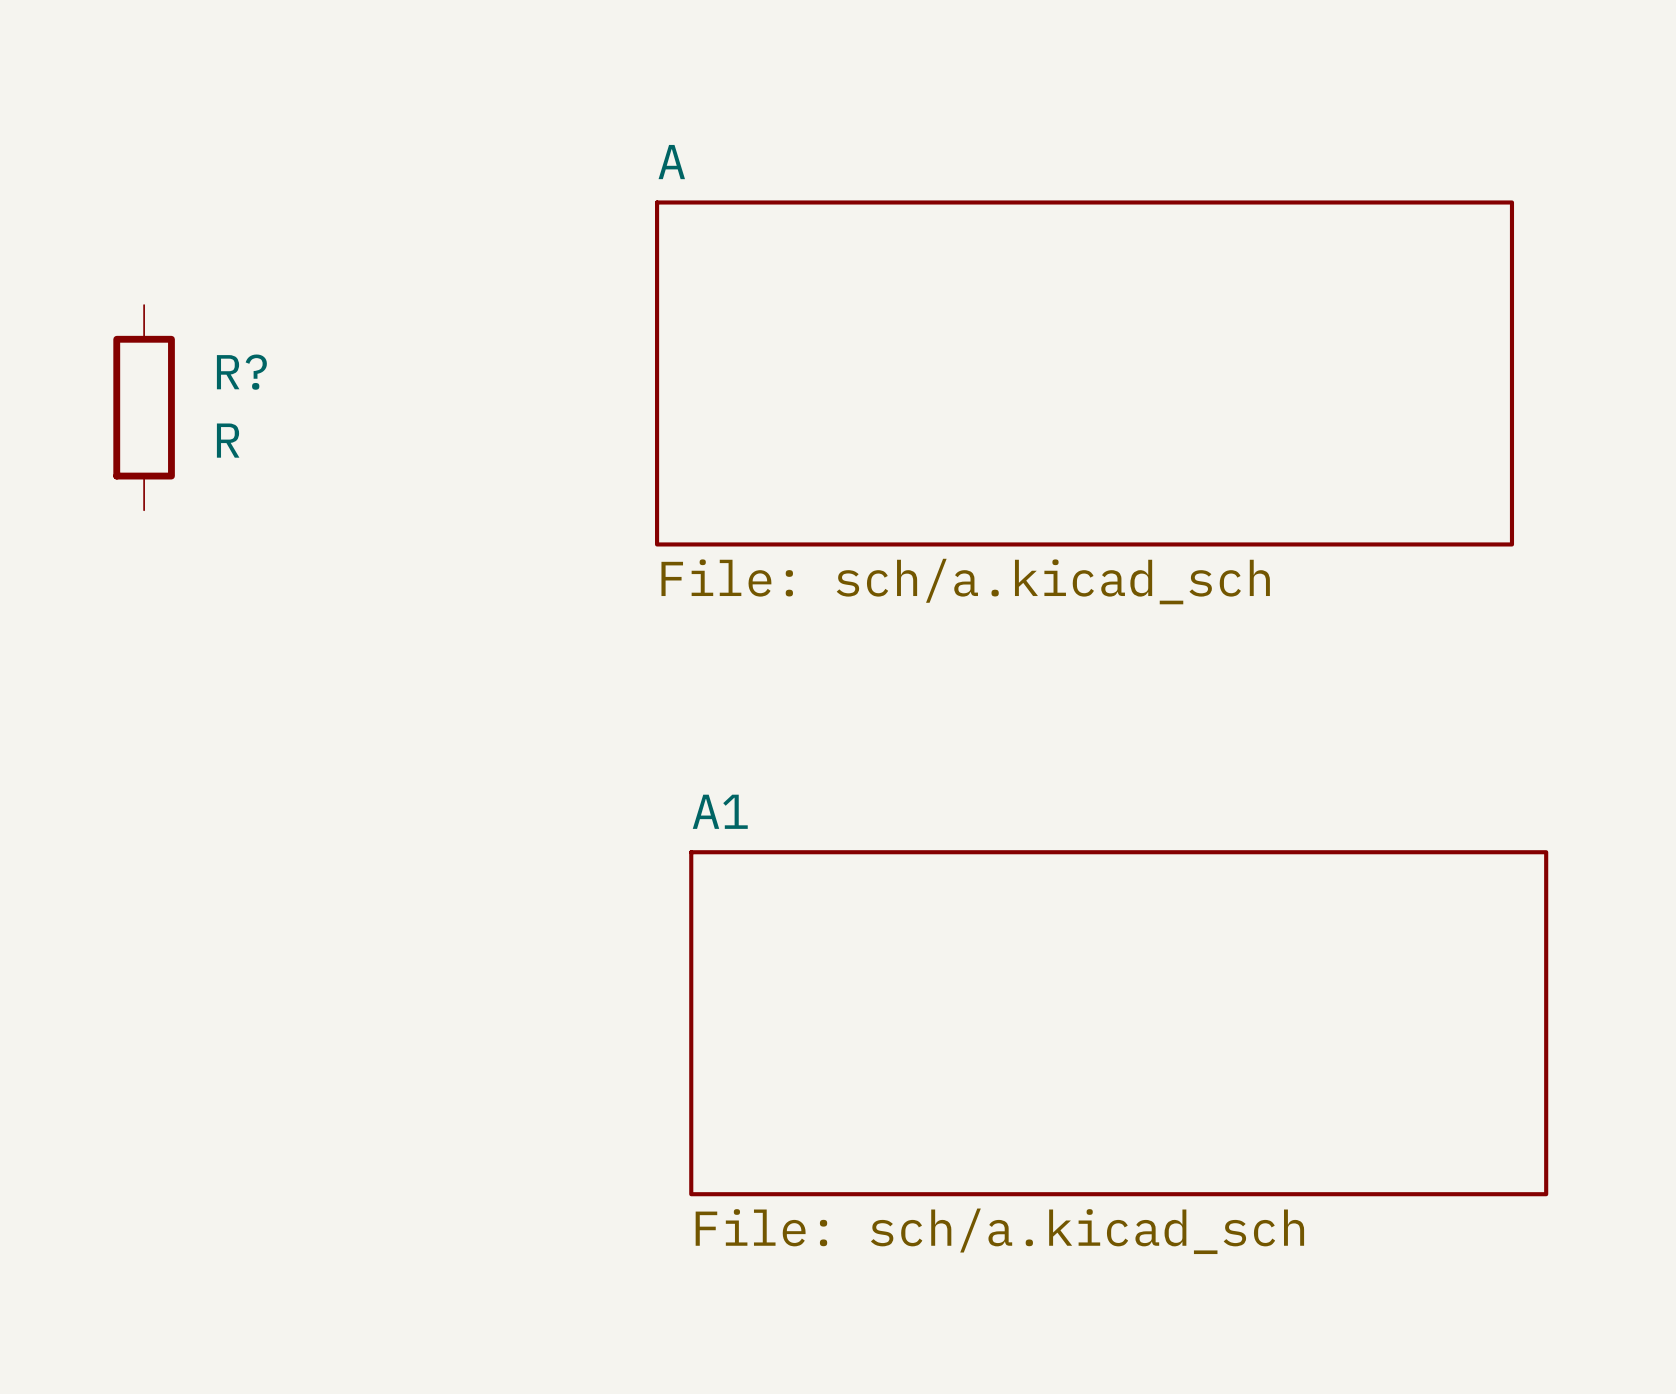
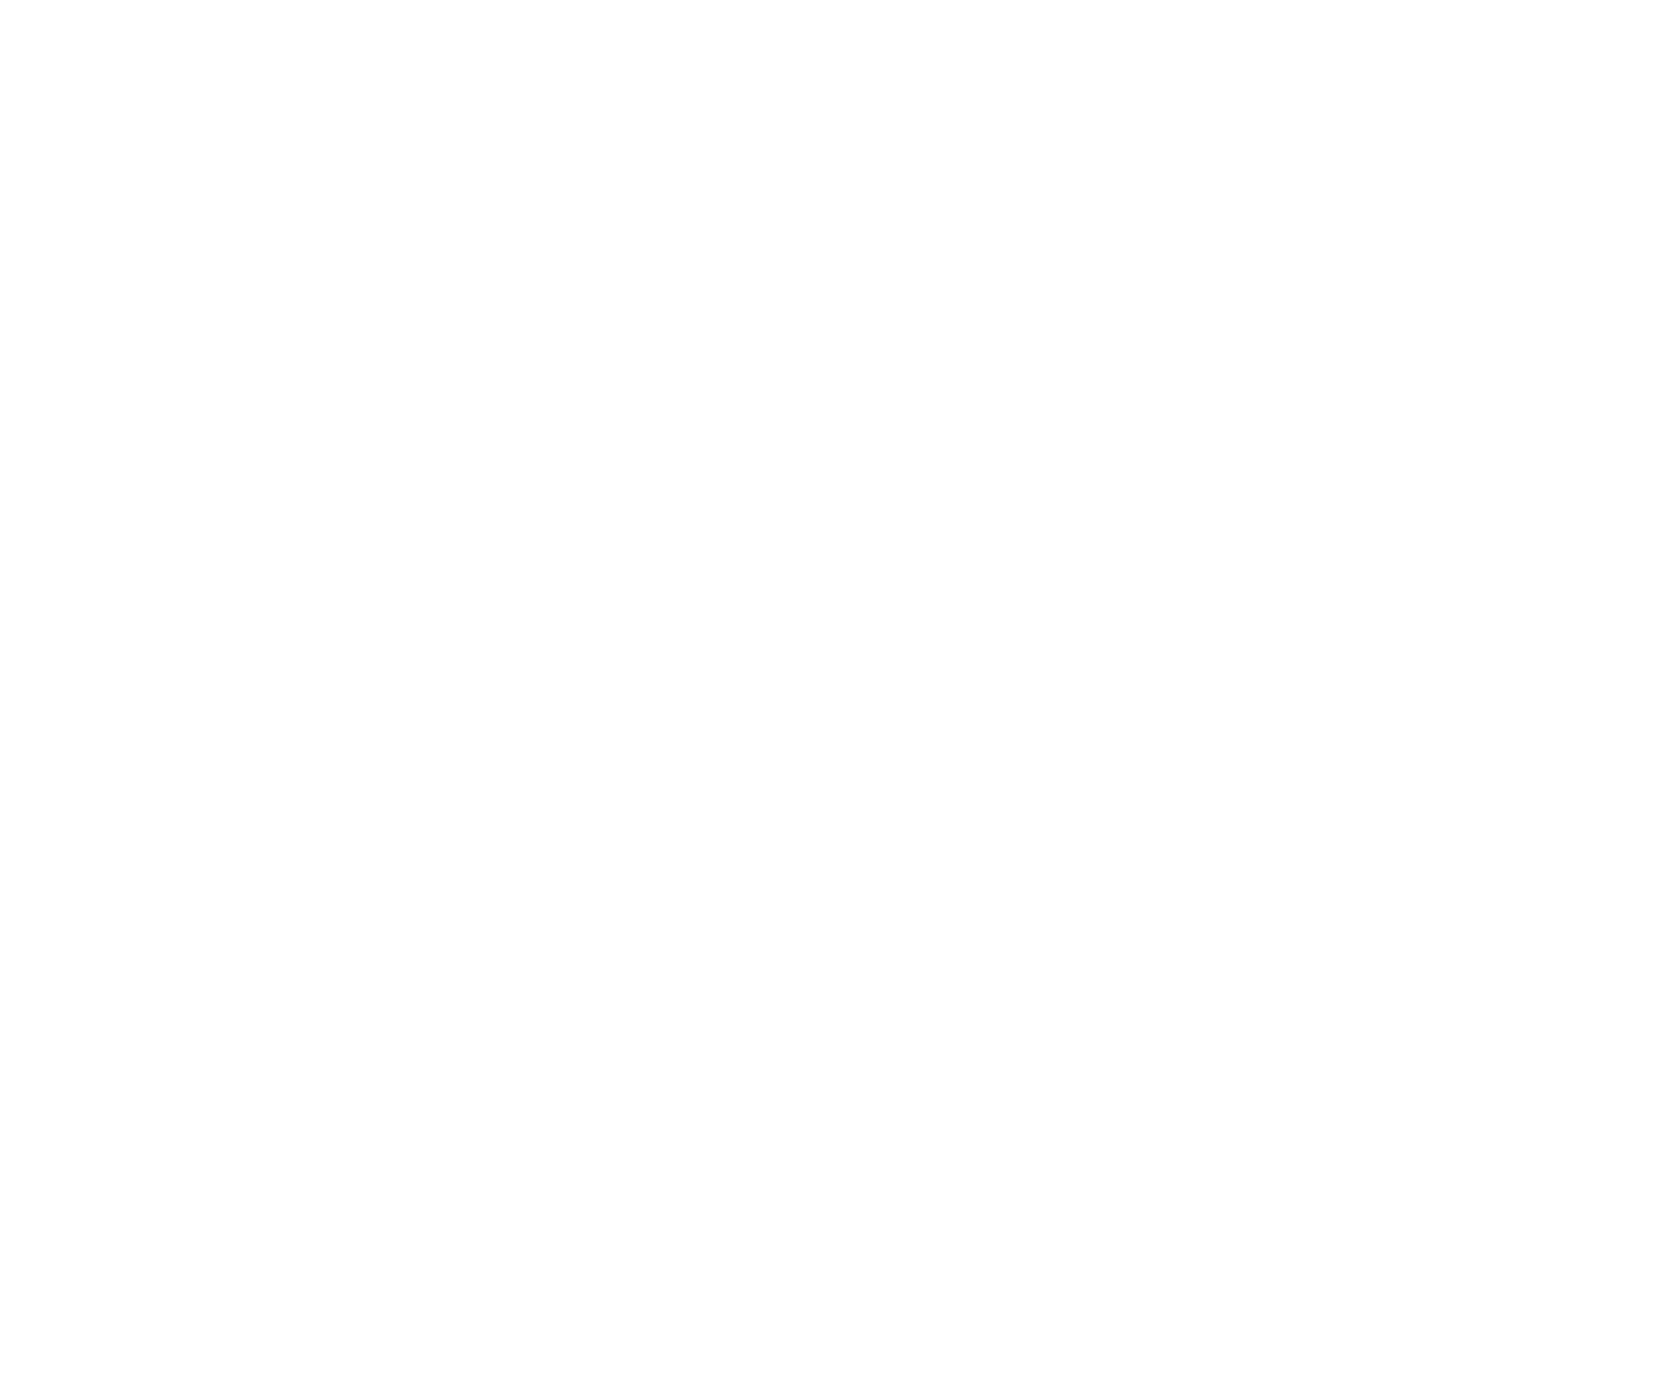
sheet A: File: sch/a.kicad_sch (1084, 373) -> none
R?: R (144, 407) -> none
sheet A1: File: sch/a.kicad_sch (1118, 1023) -> none

